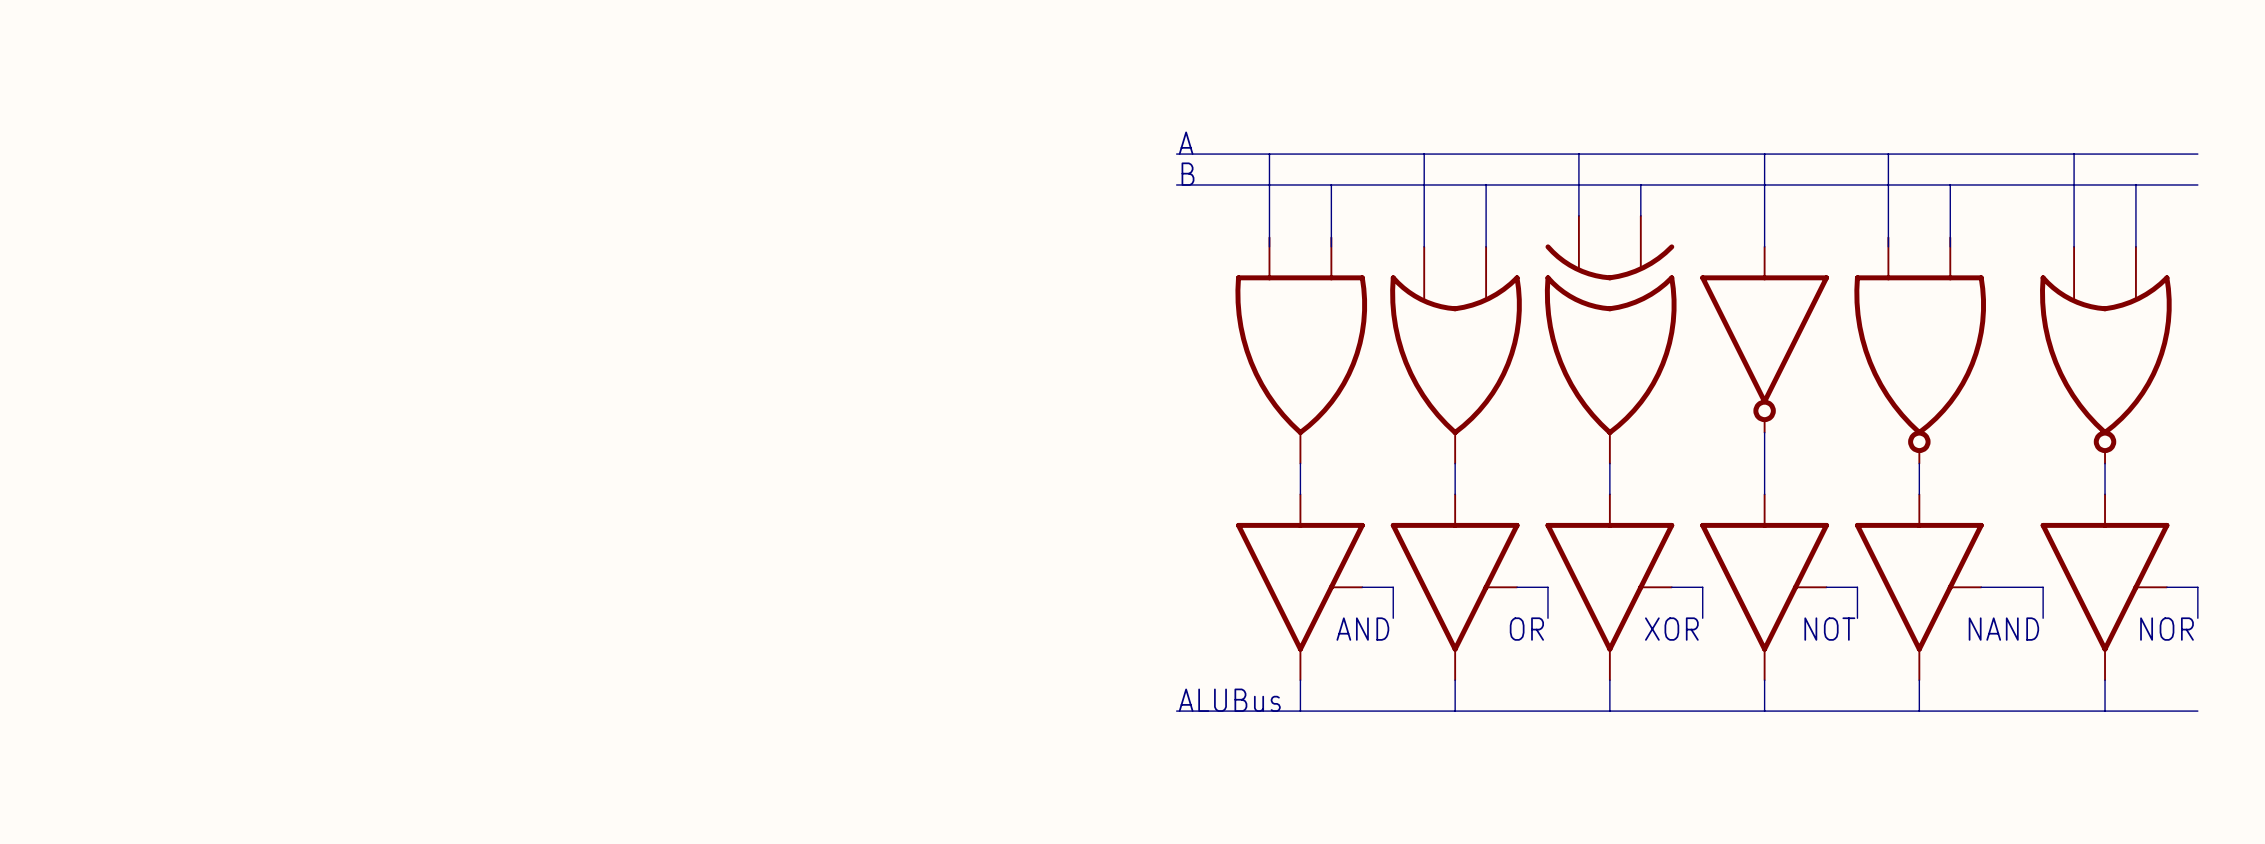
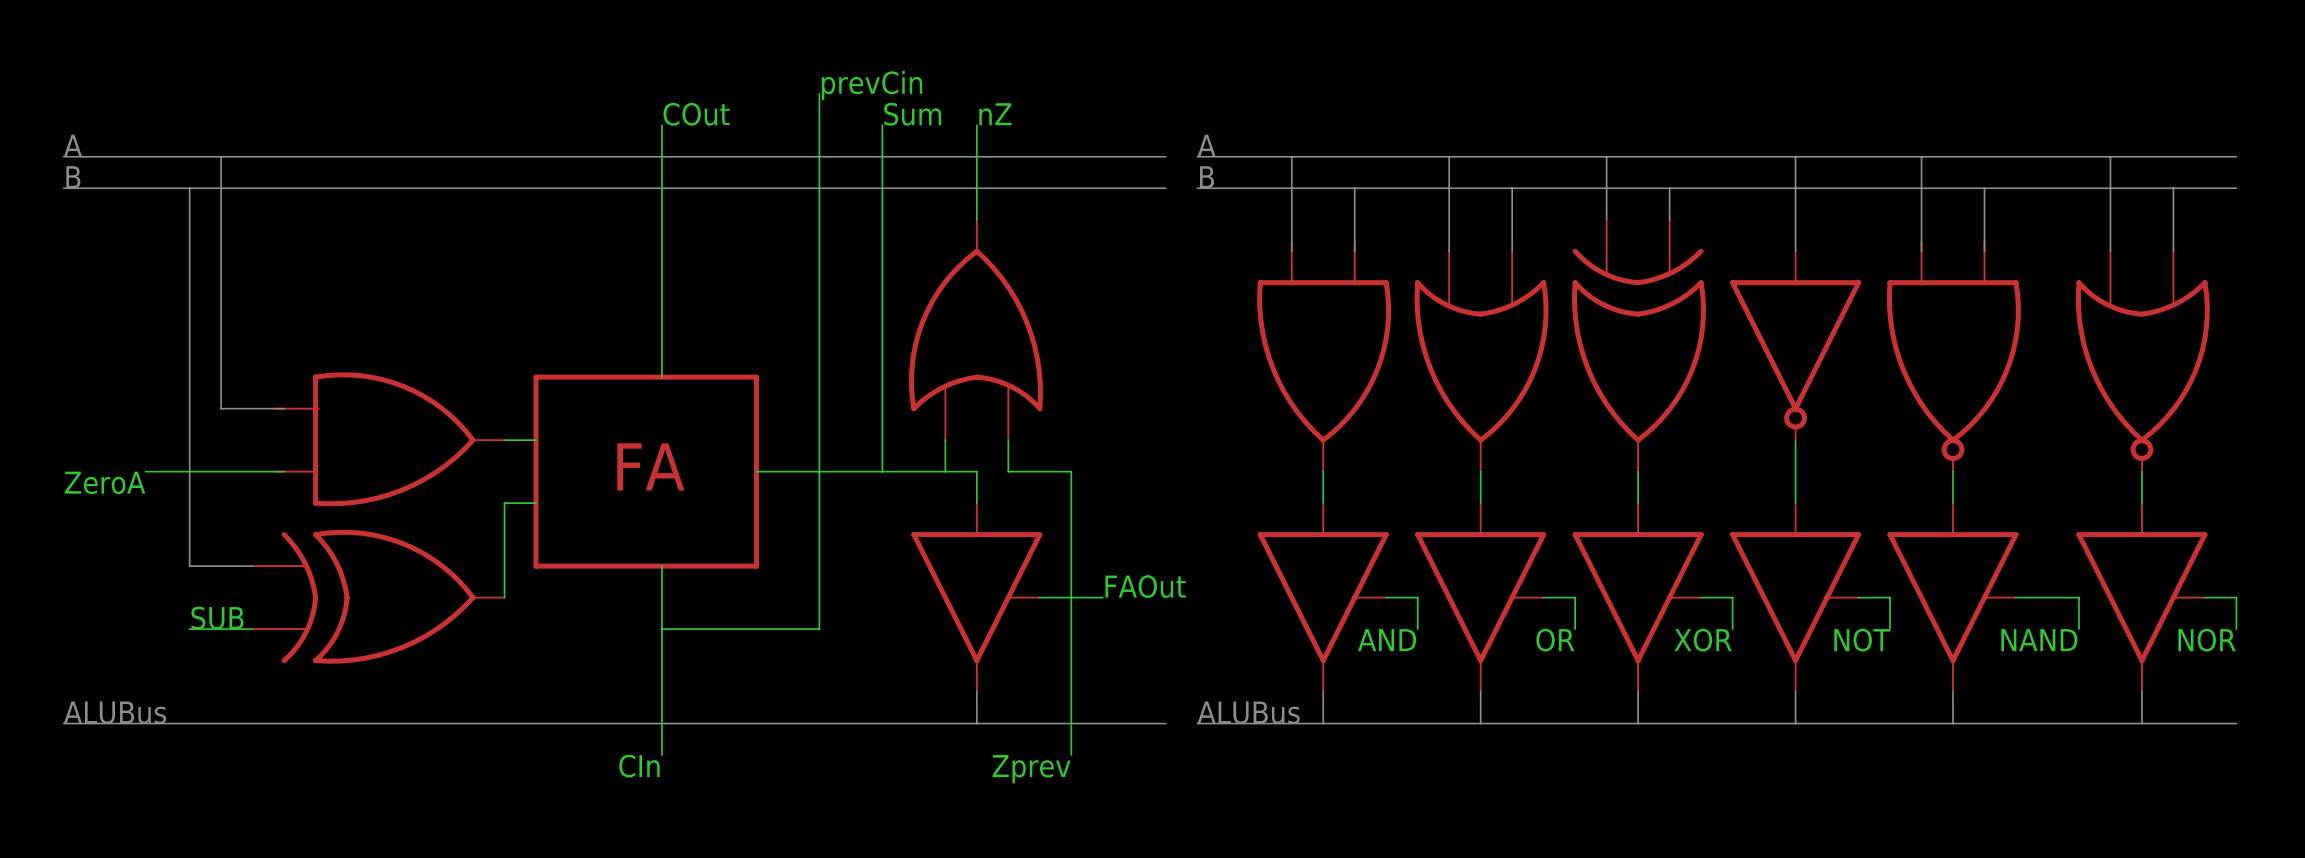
text: none -> prevCin (872, 85)
wire: none -> (819, 93) (819, 629) (661, 629)
text: none -> COut (696, 114)
text: none -> Sum (912, 114)
text: none -> nZ (995, 114)
wire: none -> (661, 125) (661, 377)
wire: none -> (882, 125) (882, 471)
wire: none -> (976, 125) (976, 219)
text: none -> A (72, 145)
bus: none -> (63, 156) (1165, 156)
bus: none -> (221, 156) (221, 408) (284, 408)
text: none -> B (73, 177)
bus: none -> (63, 188) (1165, 188)
bus: none -> (189, 188) (189, 566) (252, 566)
line: none -> (976, 219) (976, 251)
line: none -> (976, 251) (959, 265) (945, 282) (932, 300) (923, 320) (916, 342) (912, 364) (911, 386) (913, 408) (927, 396) (942, 387) (959, 380) (976, 377) (998, 381) (1011, 386) (1023, 394) (1039, 408) (1040, 383) (1037, 358) (1026, 322) (1009, 289) (994, 269) (976, 251)
line: none -> (536, 377) (756, 377) (756, 566) (536, 566) (536, 377)
line: none -> (945, 386) (945, 440)
line: none -> (1008, 386) (1008, 440)
line: none -> (274, 408) (318, 408)
line: none -> (473, 440) (504, 440)
line: none -> (473, 440) (458, 423) (441, 408) (423, 395) (403, 386) (382, 379) (360, 375) (337, 374) (315, 377) (315, 503) (340, 503) (365, 500) (401, 490) (435, 472) (455, 457) (473, 440)
wire: none -> (504, 440) (536, 440)
wire: none -> (945, 440) (945, 471)
wire: none -> (1008, 440) (1008, 471) (1071, 471) (1071, 755)
text: none -> FA (650, 466)
wire: none -> (145, 471) (284, 471)
line: none -> (274, 471) (315, 471)
wire: none -> (756, 471) (976, 471) (976, 503)
text: none -> ZeroA (105, 482)
wire: none -> (536, 503) (504, 503) (504, 597)
line: none -> (976, 503) (976, 534)
line: none -> (284, 534) (295, 548) (305, 563) (311, 580) (315, 597) (311, 618) (306, 632) (298, 644) (284, 660)
line: none -> (252, 566) (306, 566)
wire: none -> (661, 566) (661, 755)
text: none -> FAOut (1145, 586)
line: none -> (473, 597) (504, 597)
line: none -> (473, 597) (458, 580) (441, 565) (423, 553) (403, 543) (382, 536) (360, 533) (337, 532) (315, 534) (327, 548) (336, 563) (343, 580) (347, 597) (343, 618) (337, 632) (330, 644) (315, 660) (340, 661) (365, 658) (401, 647) (435, 630) (455, 615) (473, 597)
line: none -> (1008, 597) (1039, 597)
wire: none -> (1039, 597) (1102, 597)
text: none -> SUB (217, 618)
wire: none -> (189, 629) (252, 629)
line: none -> (252, 629) (306, 629)
line: none -> (976, 660) (1039, 534) (913, 534) (976, 660)
line: none -> (976, 660) (976, 692)
bus: none -> (976, 692) (976, 723)
text: none -> ALUBus (115, 712)
bus: none -> (63, 723) (1165, 723)
text: none -> CIn (639, 766)
text: none -> Zprev (1031, 769)

